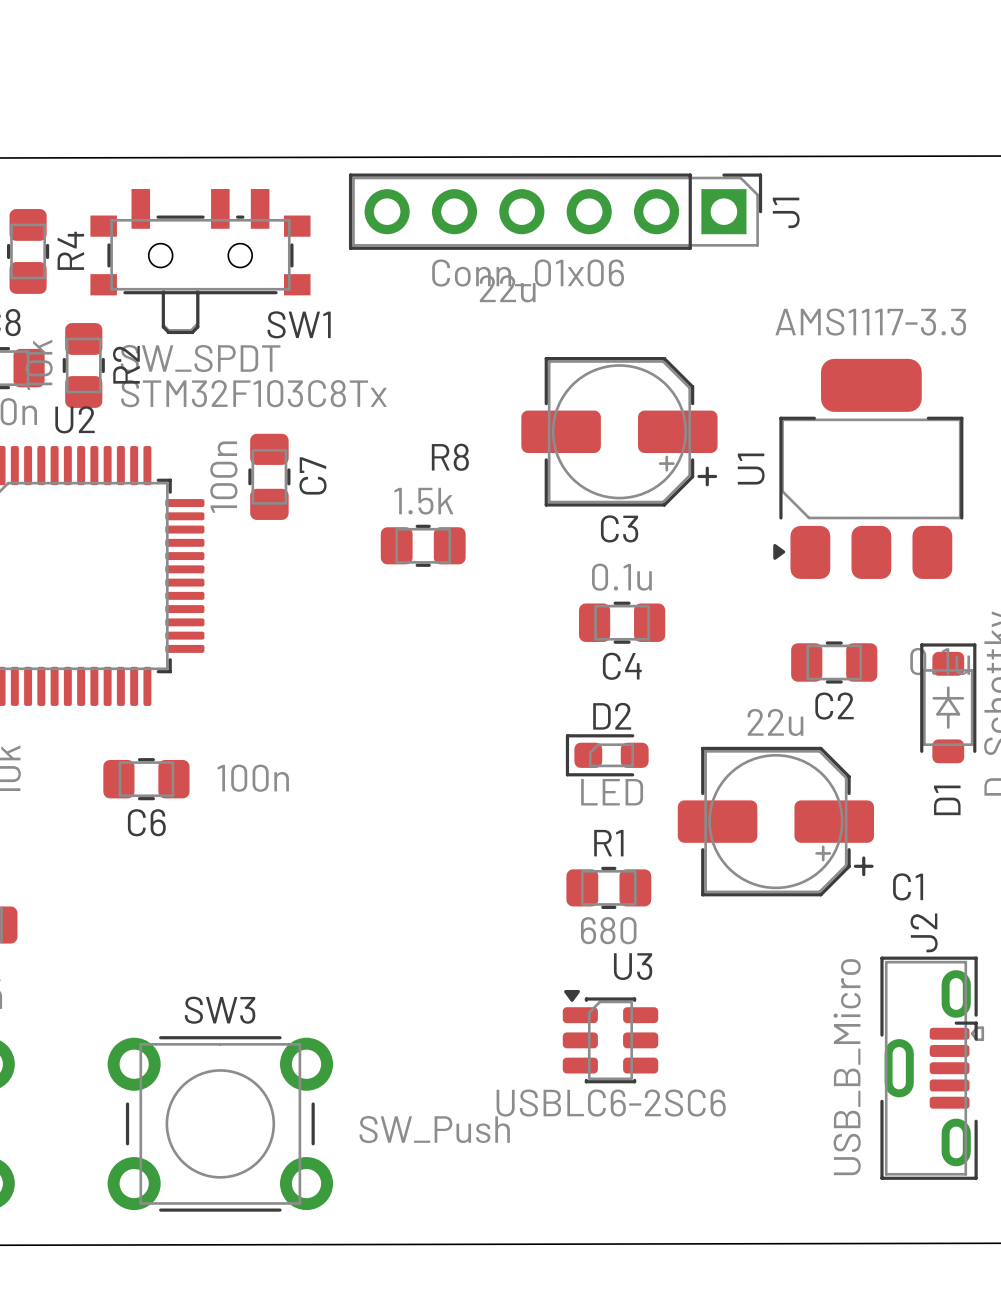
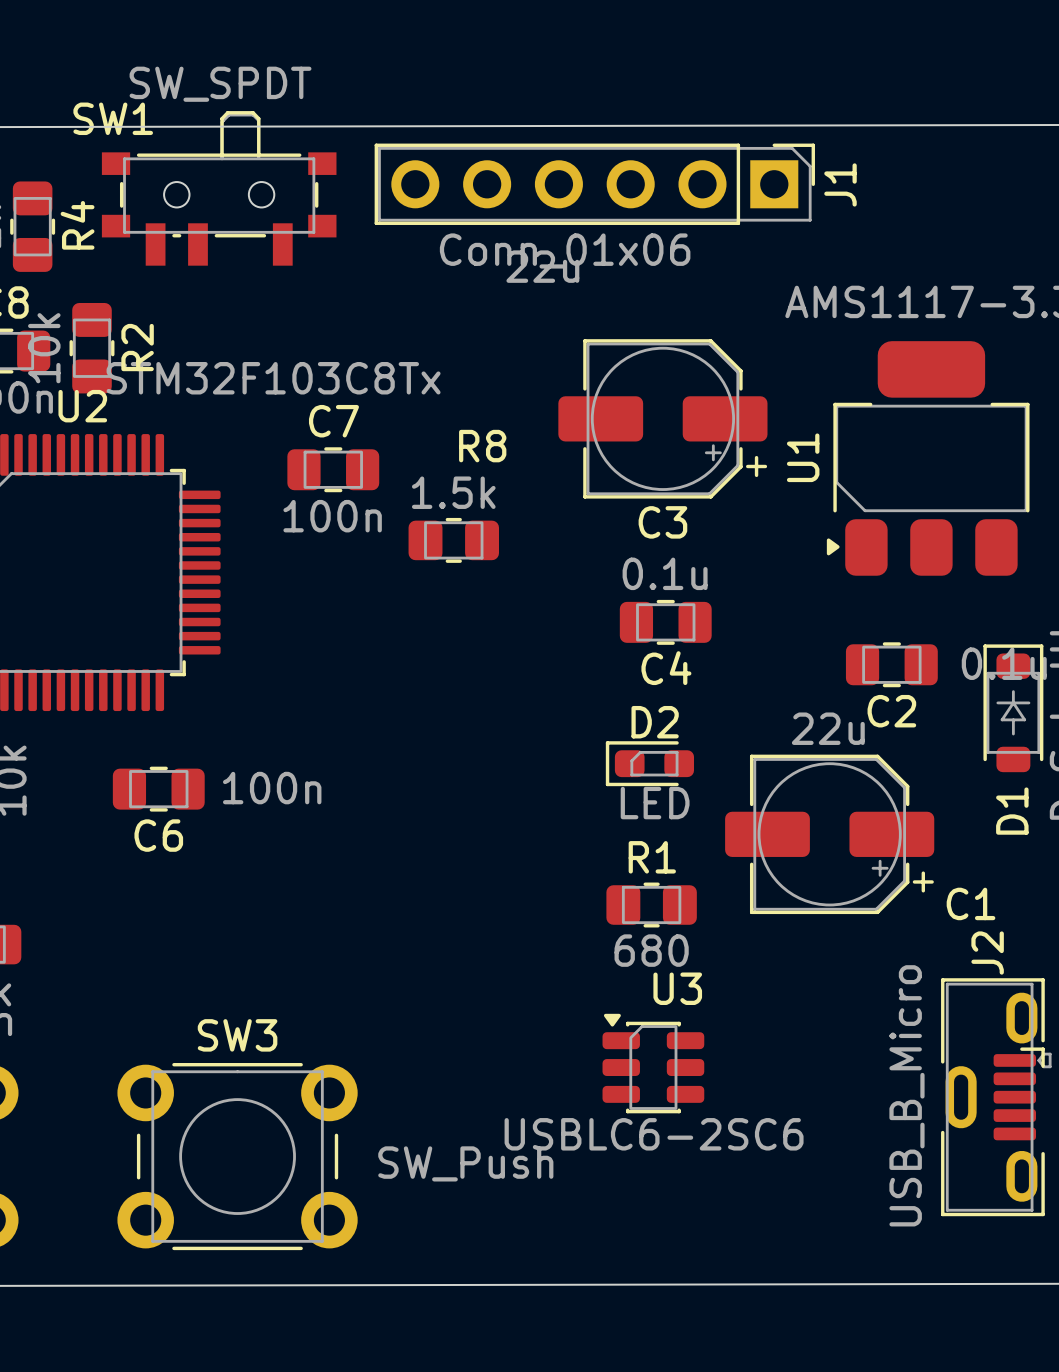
SW1 rotation: 0° (200, 261) -> 180° (219, 188)
C7 name position: C7 (312, 475) -> C7 (333, 421)
C7 rotation: 0° (269, 476) -> 90° clockwise (333, 469)
C7 value position: 100n (223, 477) -> 100n (332, 516)

